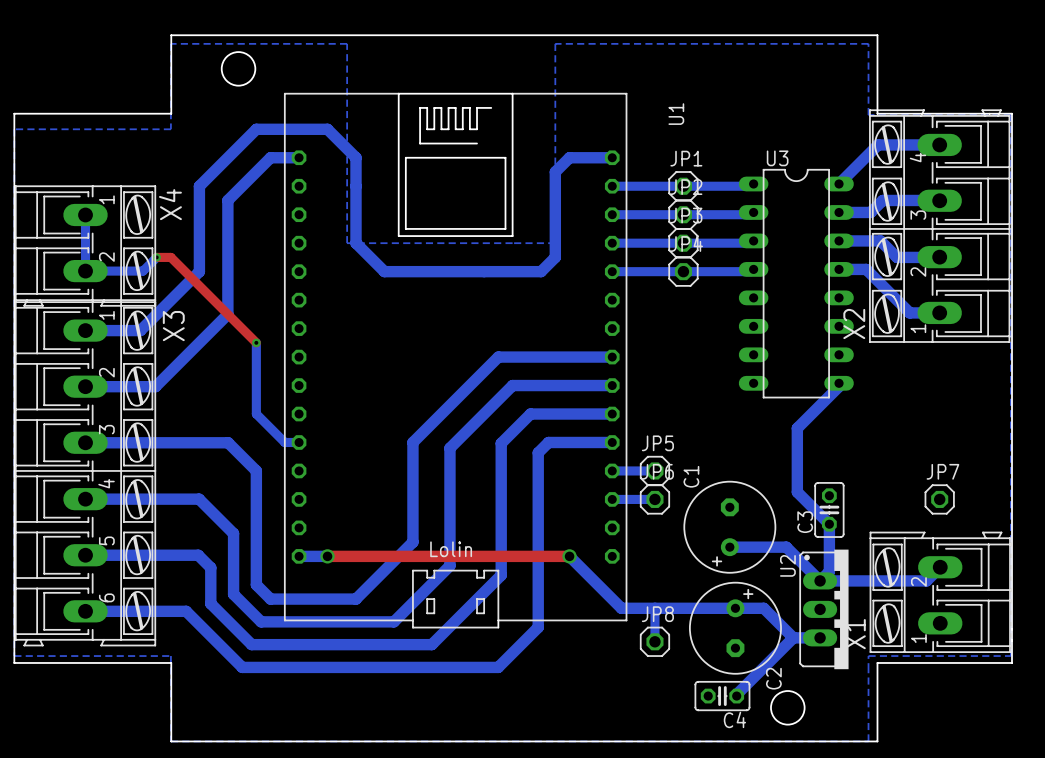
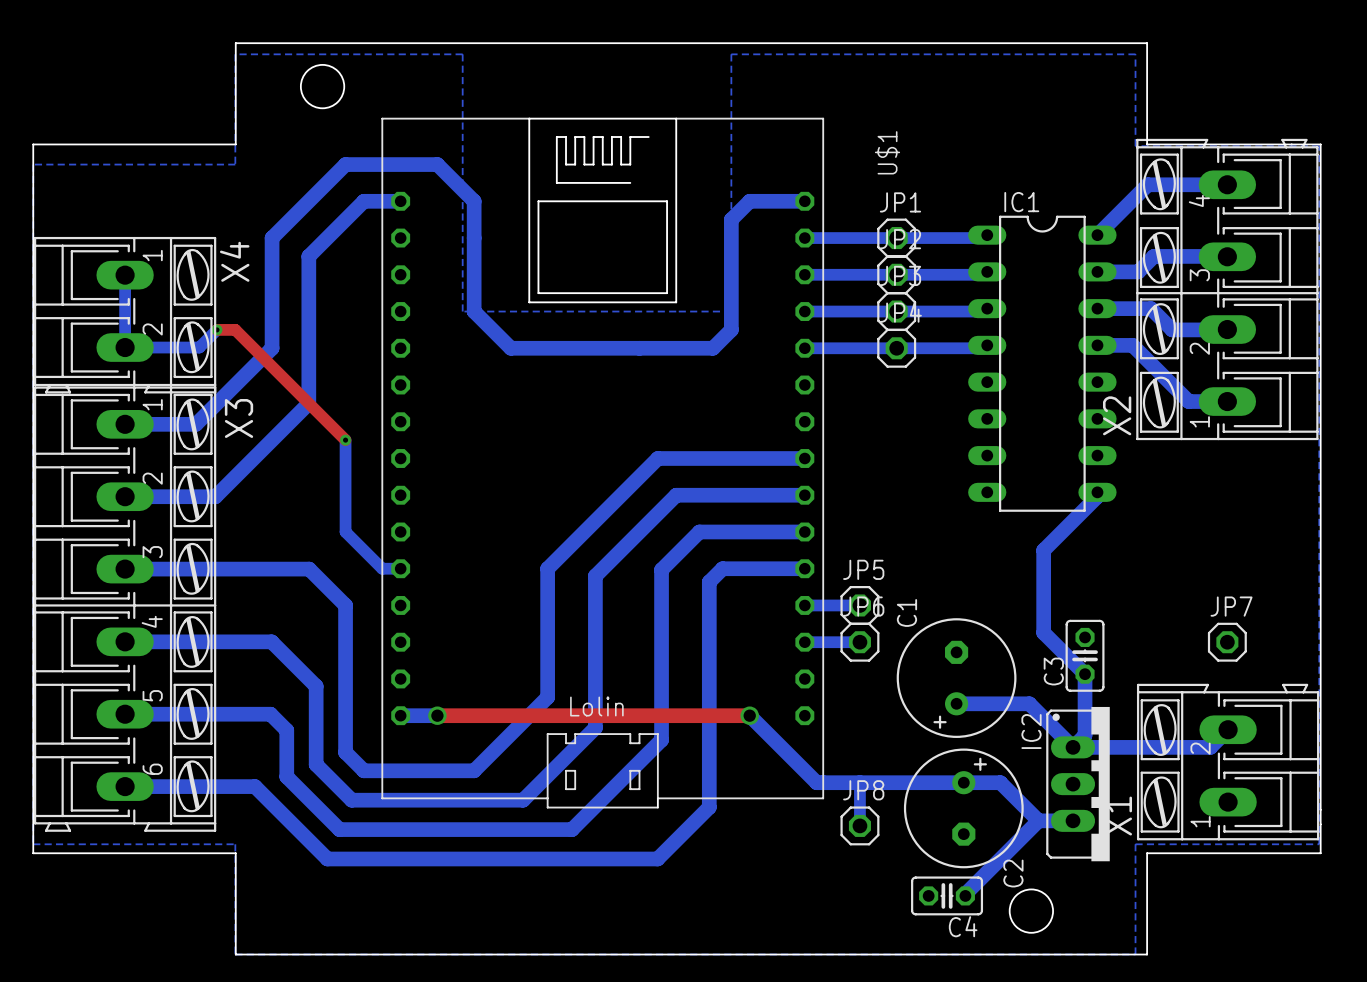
U1 name: U1 (676, 114) -> U$1 (887, 152)
U3 name: U3 (777, 158) -> IC1 (1021, 202)
U2 name: U2 (787, 565) -> IC2 (1031, 731)

